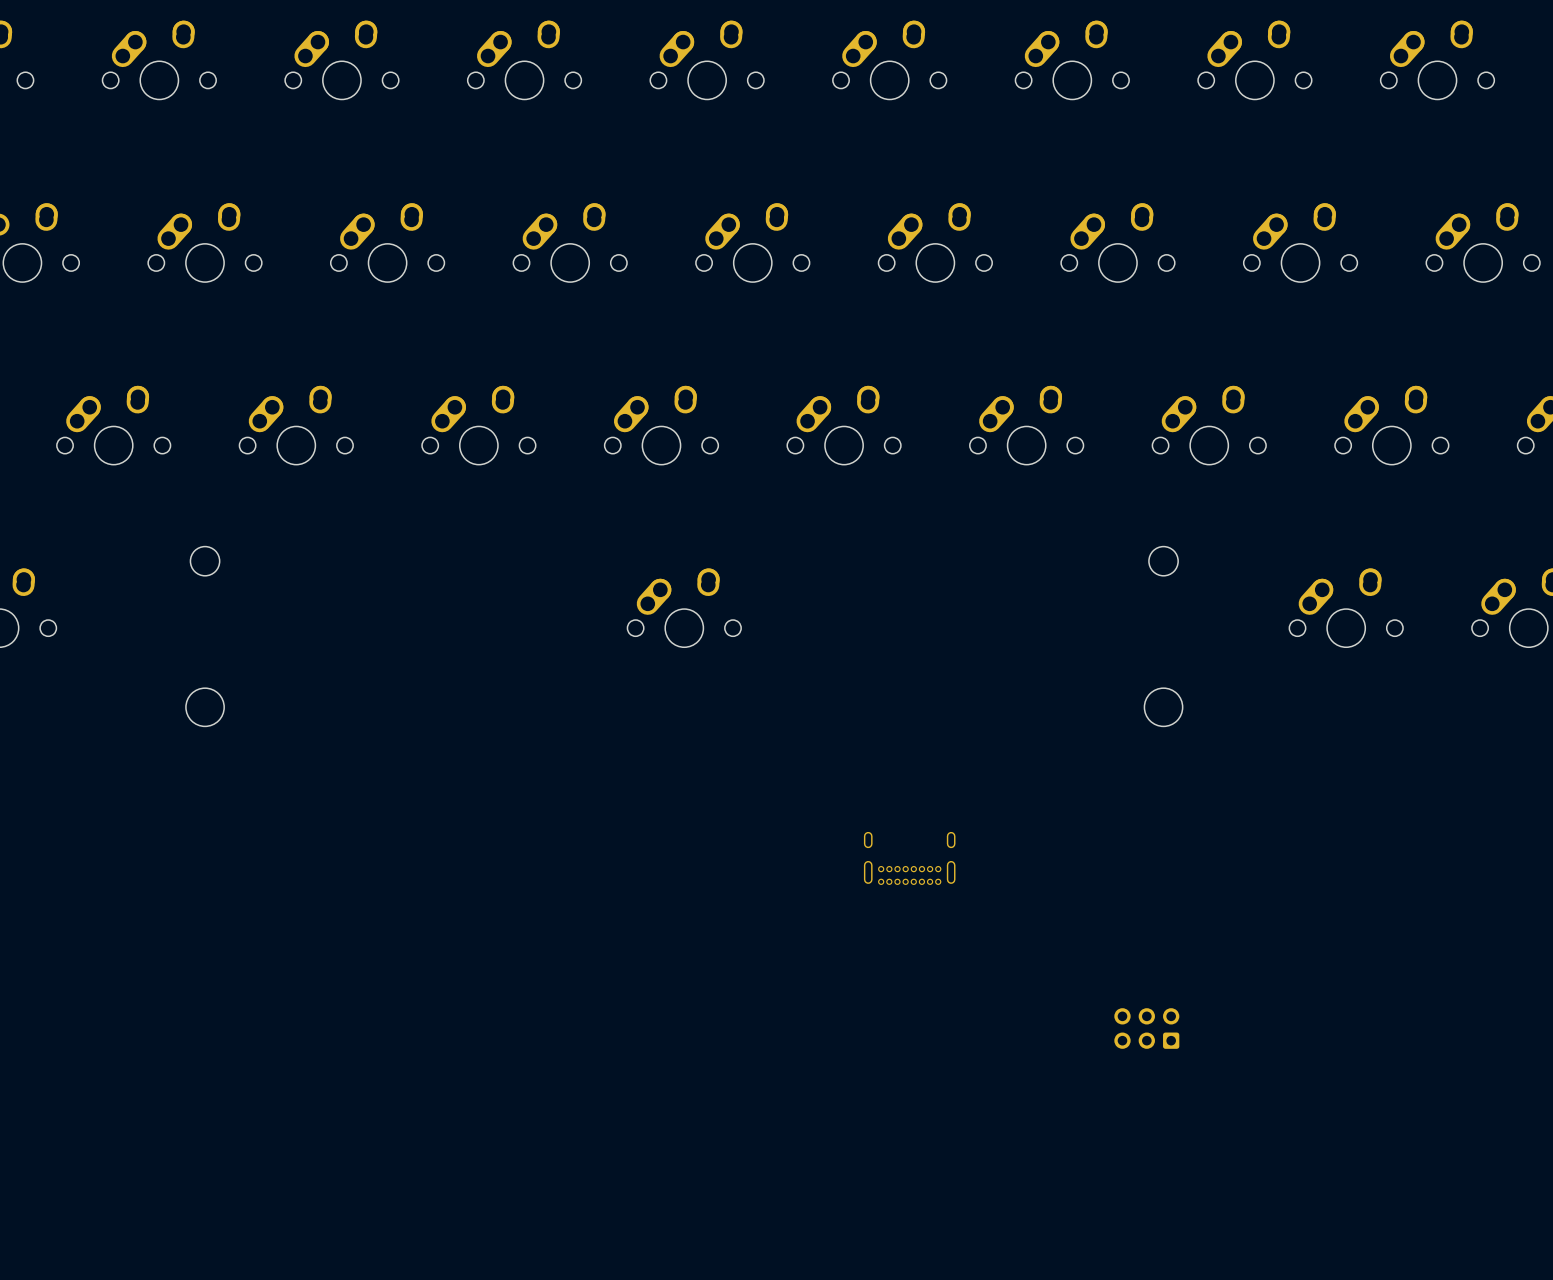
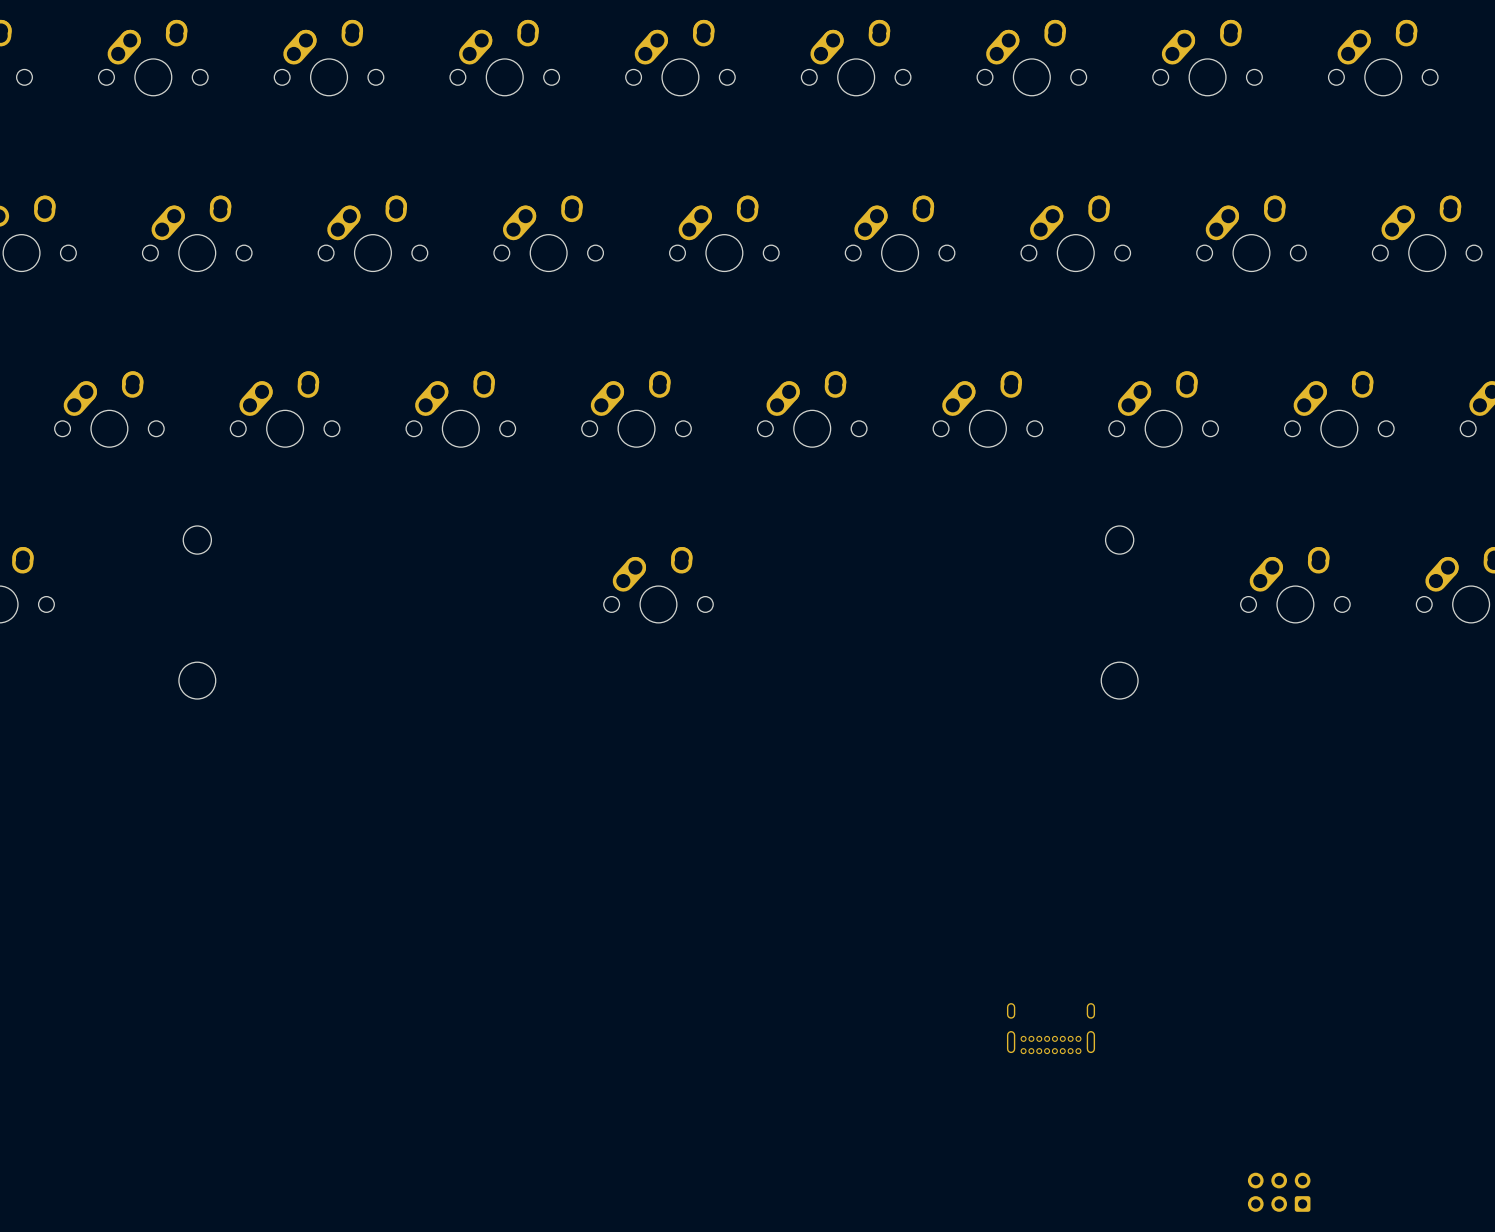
part: (909, 858) -> none
part: (1146, 1028) -> none
part: none -> (1051, 1028)
part: none -> (1279, 1192)

